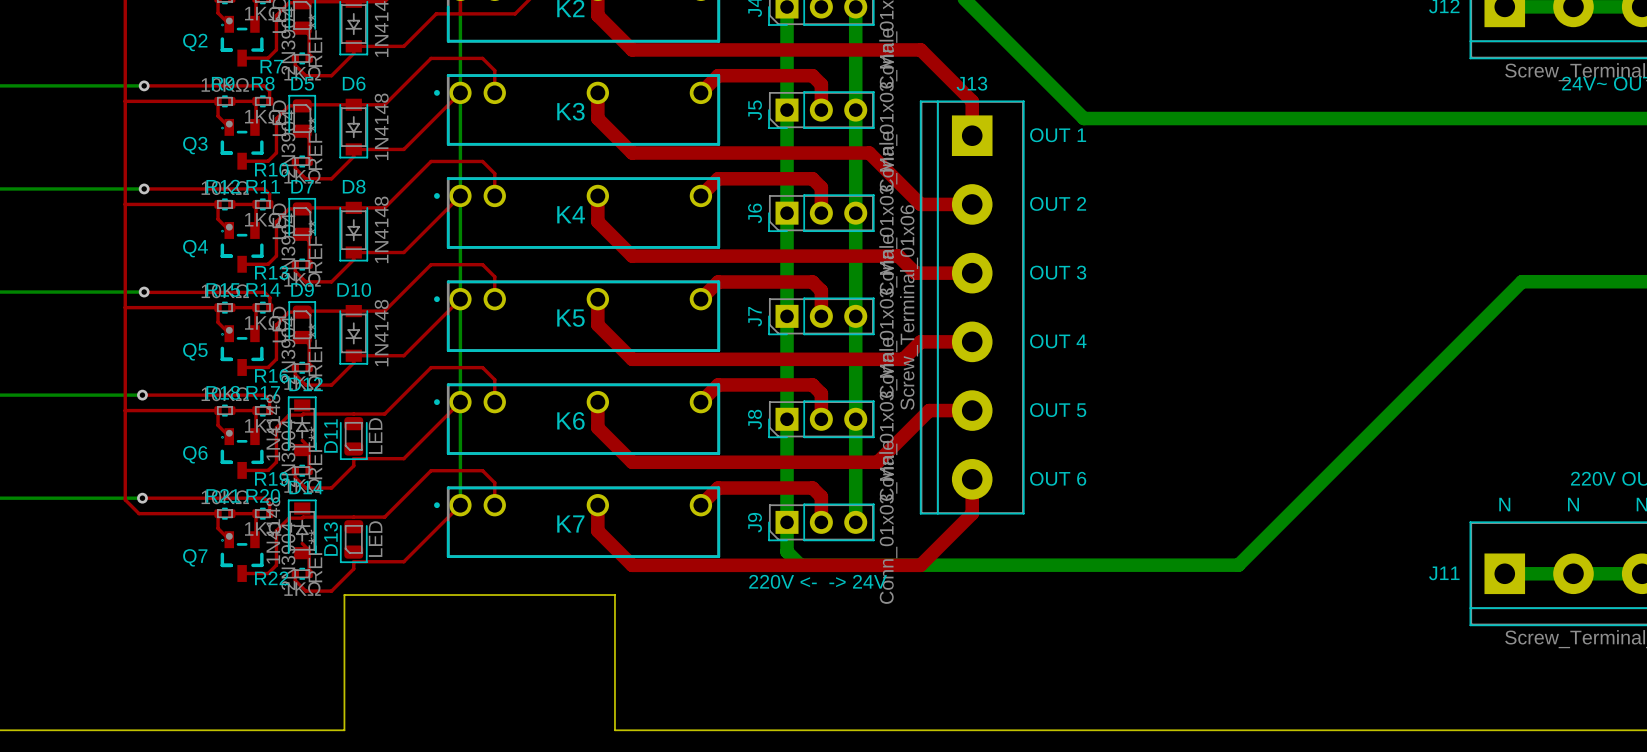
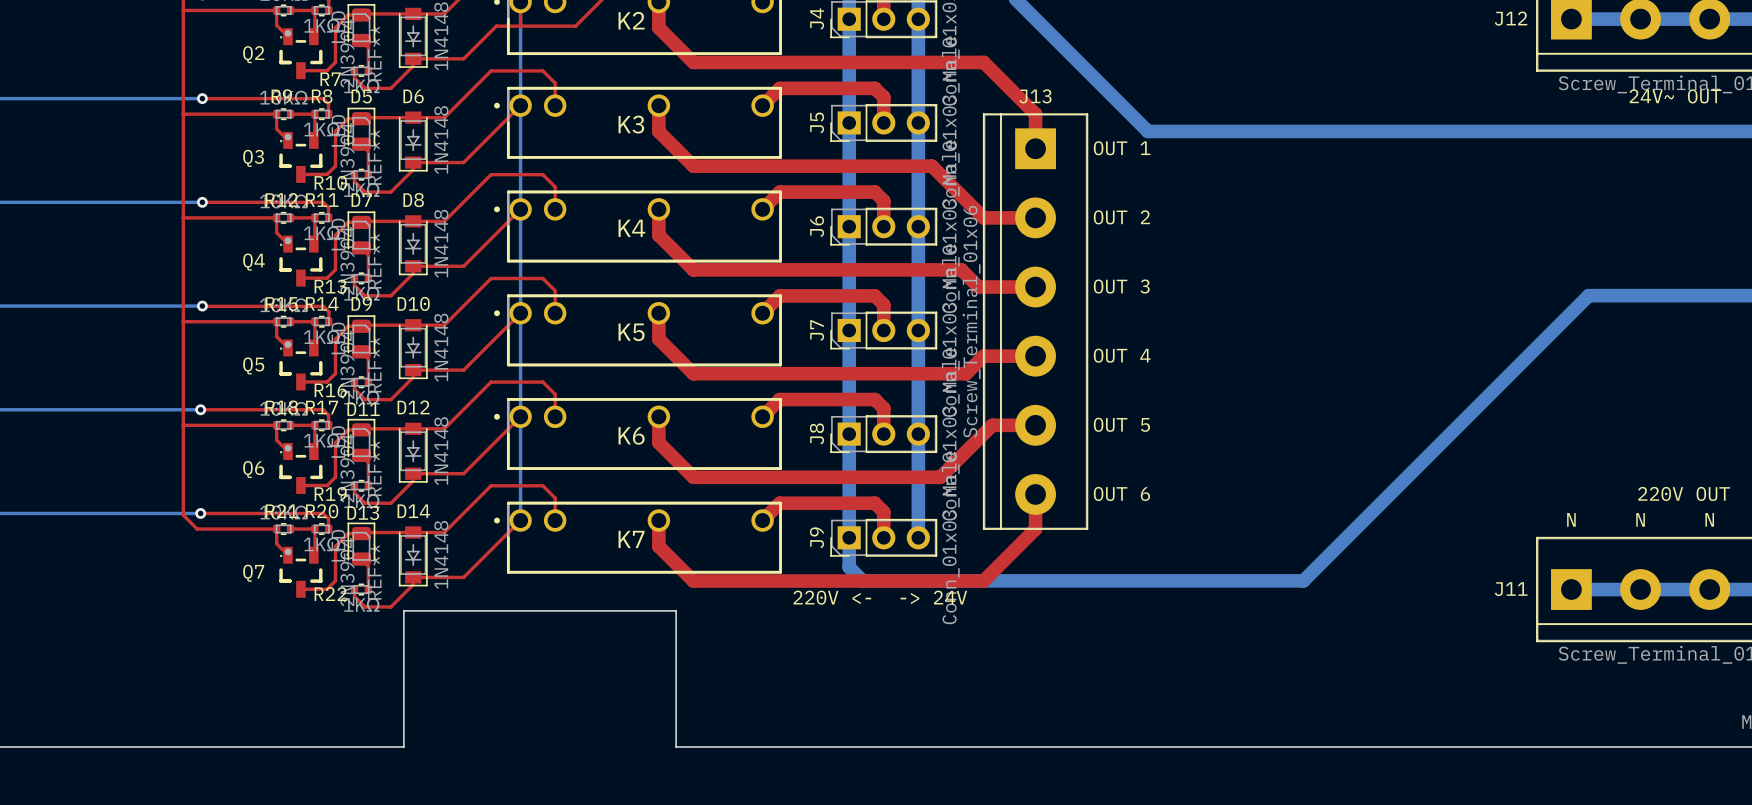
D12 rotation: 0° (302, 426) -> 180° (413, 452)
D12 position: (302, 426) -> (413, 452)
D11 name position: D11 (330, 436) -> D11 (363, 409)
D11 rotation: 0° (353, 438) -> 180° (361, 440)
D11 position: (353, 438) -> (361, 440)
D14 rotation: 0° (302, 529) -> 180° (413, 556)
D14 position: (302, 529) -> (413, 556)
D13 name position: D13 (330, 539) -> D13 (363, 512)
D13 rotation: 0° (353, 541) -> 180° (361, 544)
D13 position: (353, 541) -> (361, 544)

